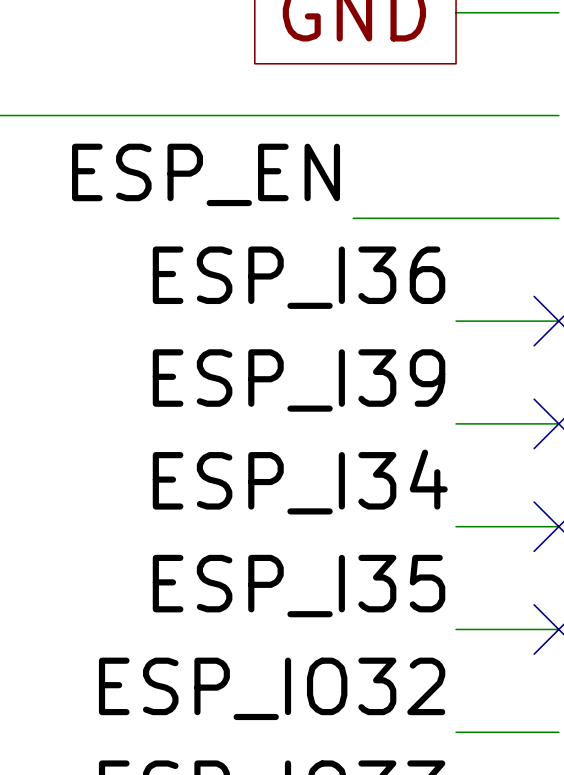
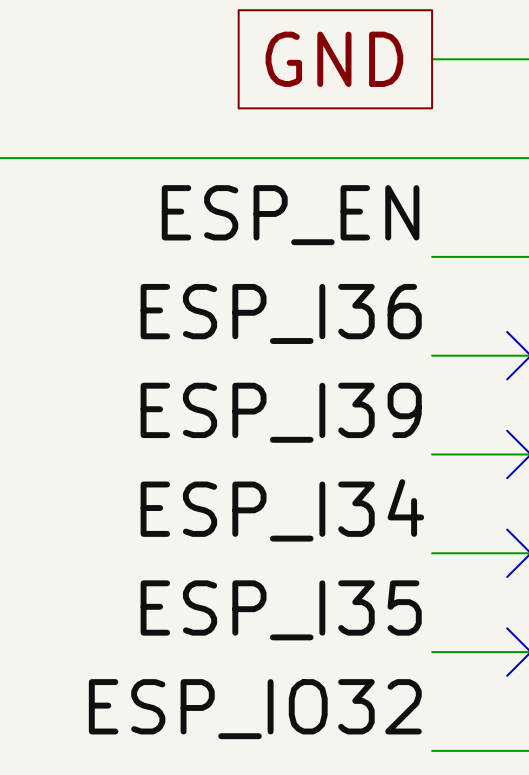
label position: ESP_EN (206, 174) -> ESP_EN (290, 215)
wire: (353, 218) (456, 218) -> none

